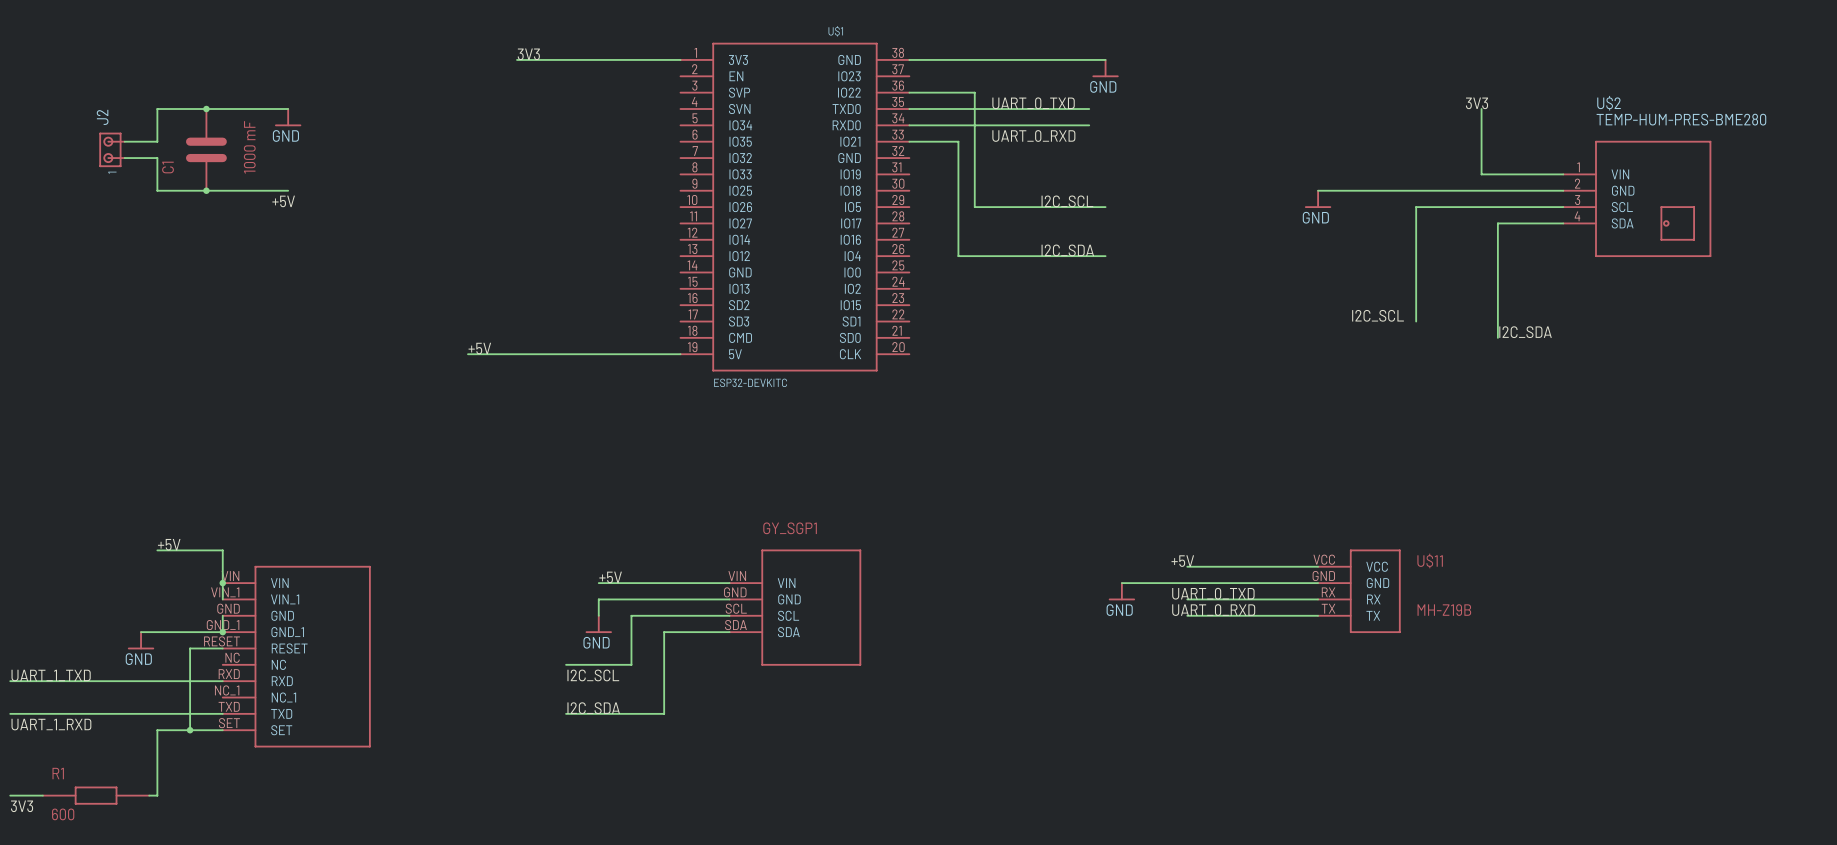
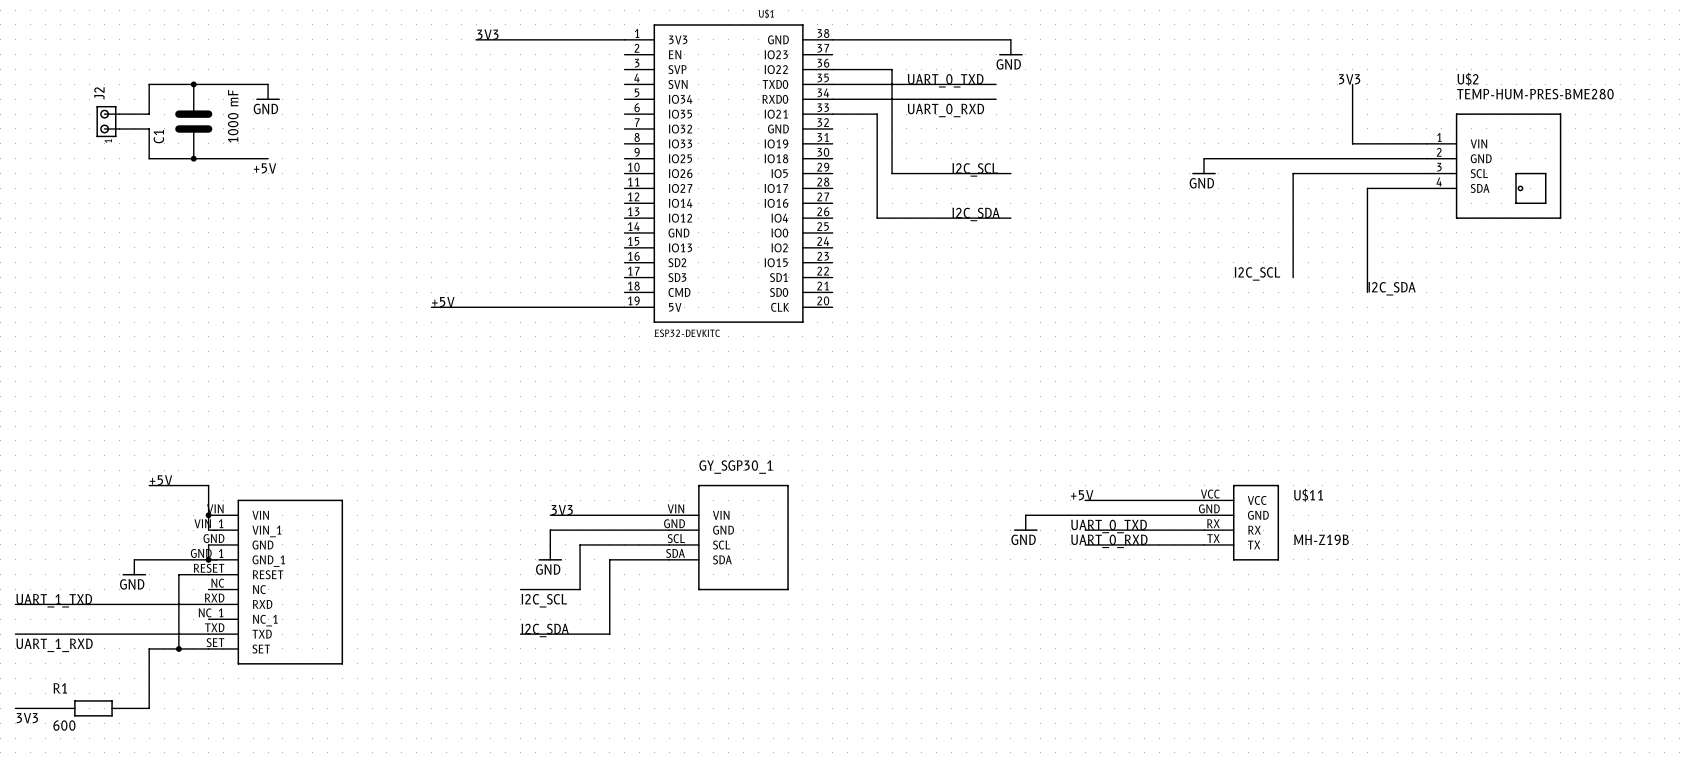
GY_SGP1 name: GY_SGP1 (790, 528) -> GY_SGP30_1 (735, 467)
label: +5V (610, 577) -> 3V3 (562, 510)

